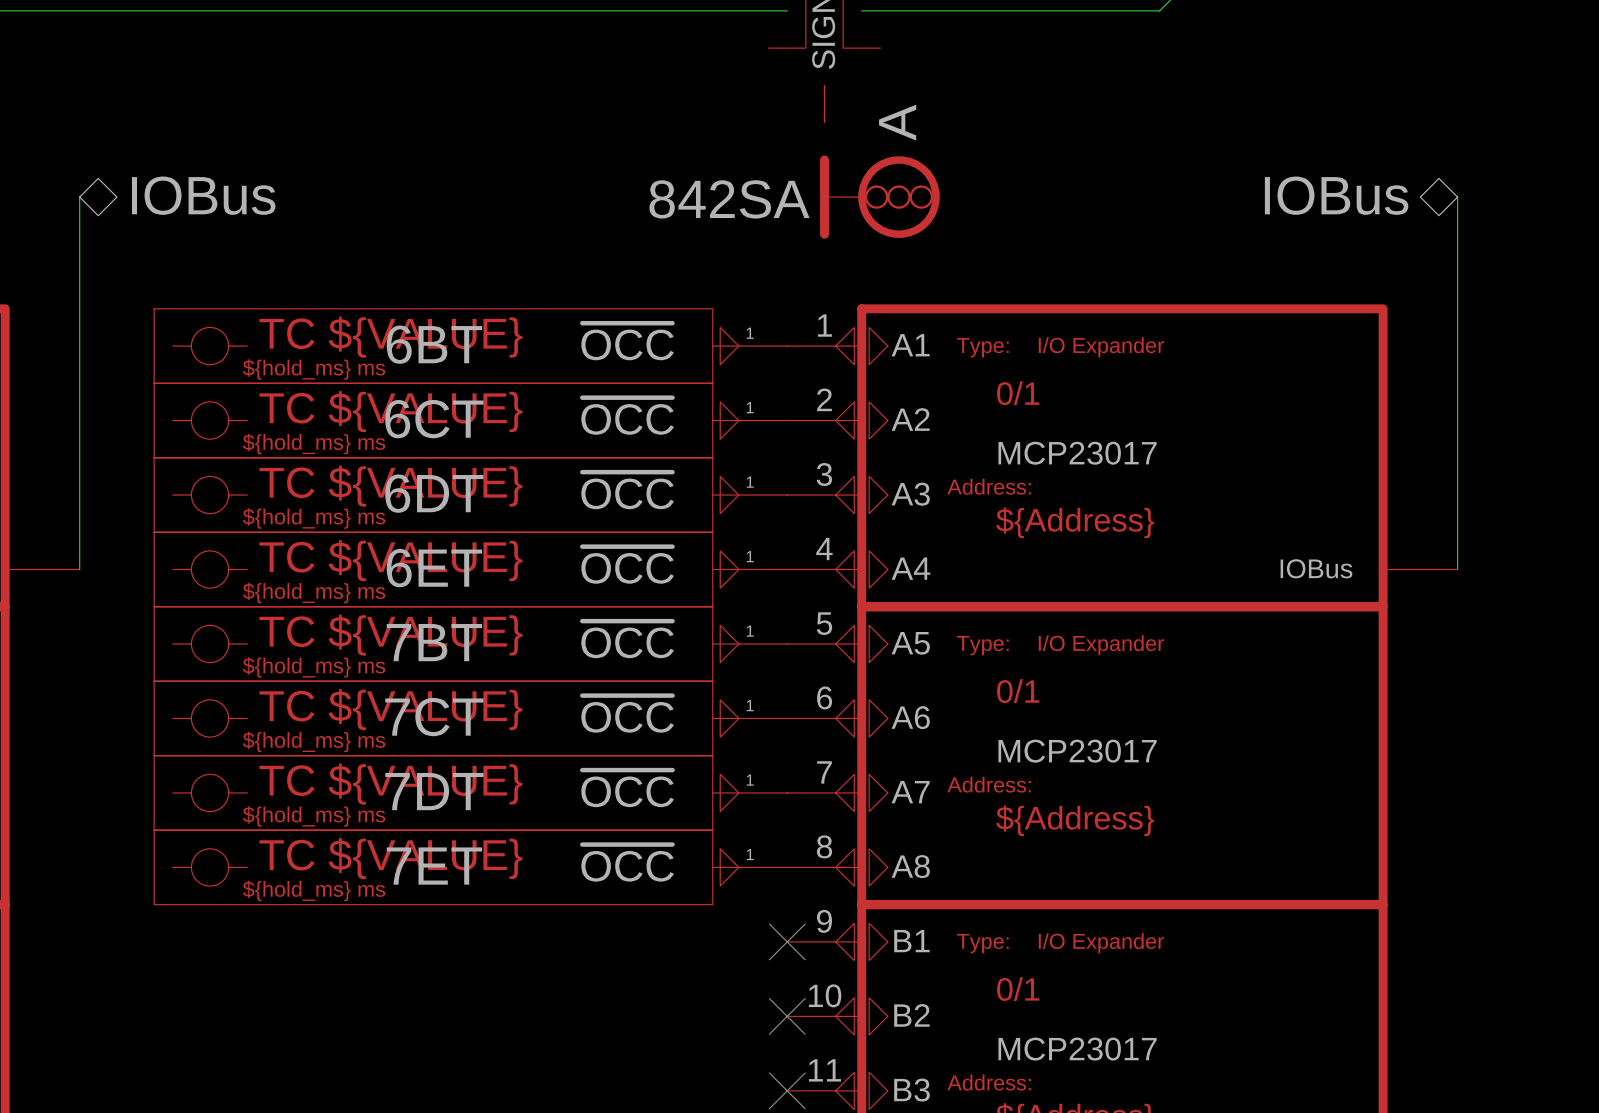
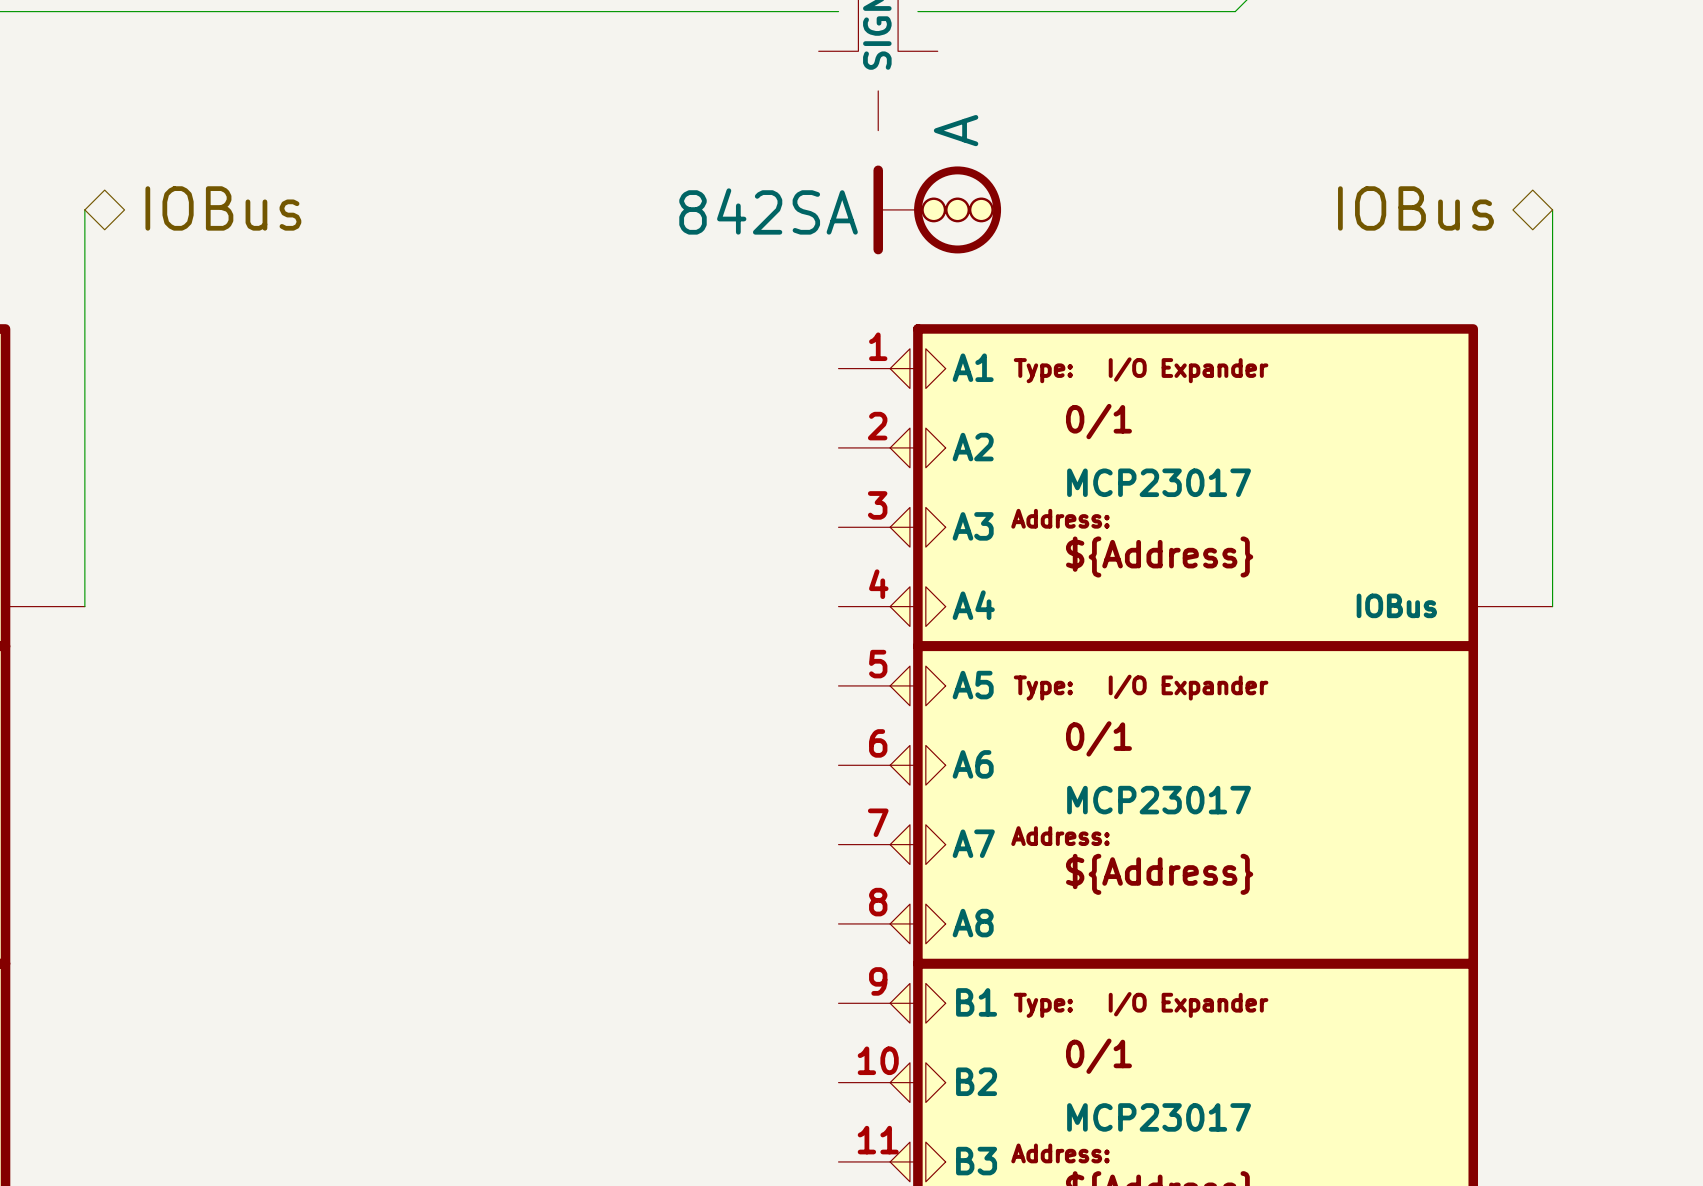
part: 6BT (470, 346) -> none
part: 6CT (470, 420) -> none
part: 6DT (470, 495) -> none
part: 6ET (470, 569) -> none
part: 7BT (470, 643) -> none
part: 7CT (470, 718) -> none
part: 7DT (470, 792) -> none
part: 7ET (470, 867) -> none
no-connect mark: (787, 941) -> none
no-connect mark: (787, 1016) -> none
no-connect mark: (787, 1090) -> none

